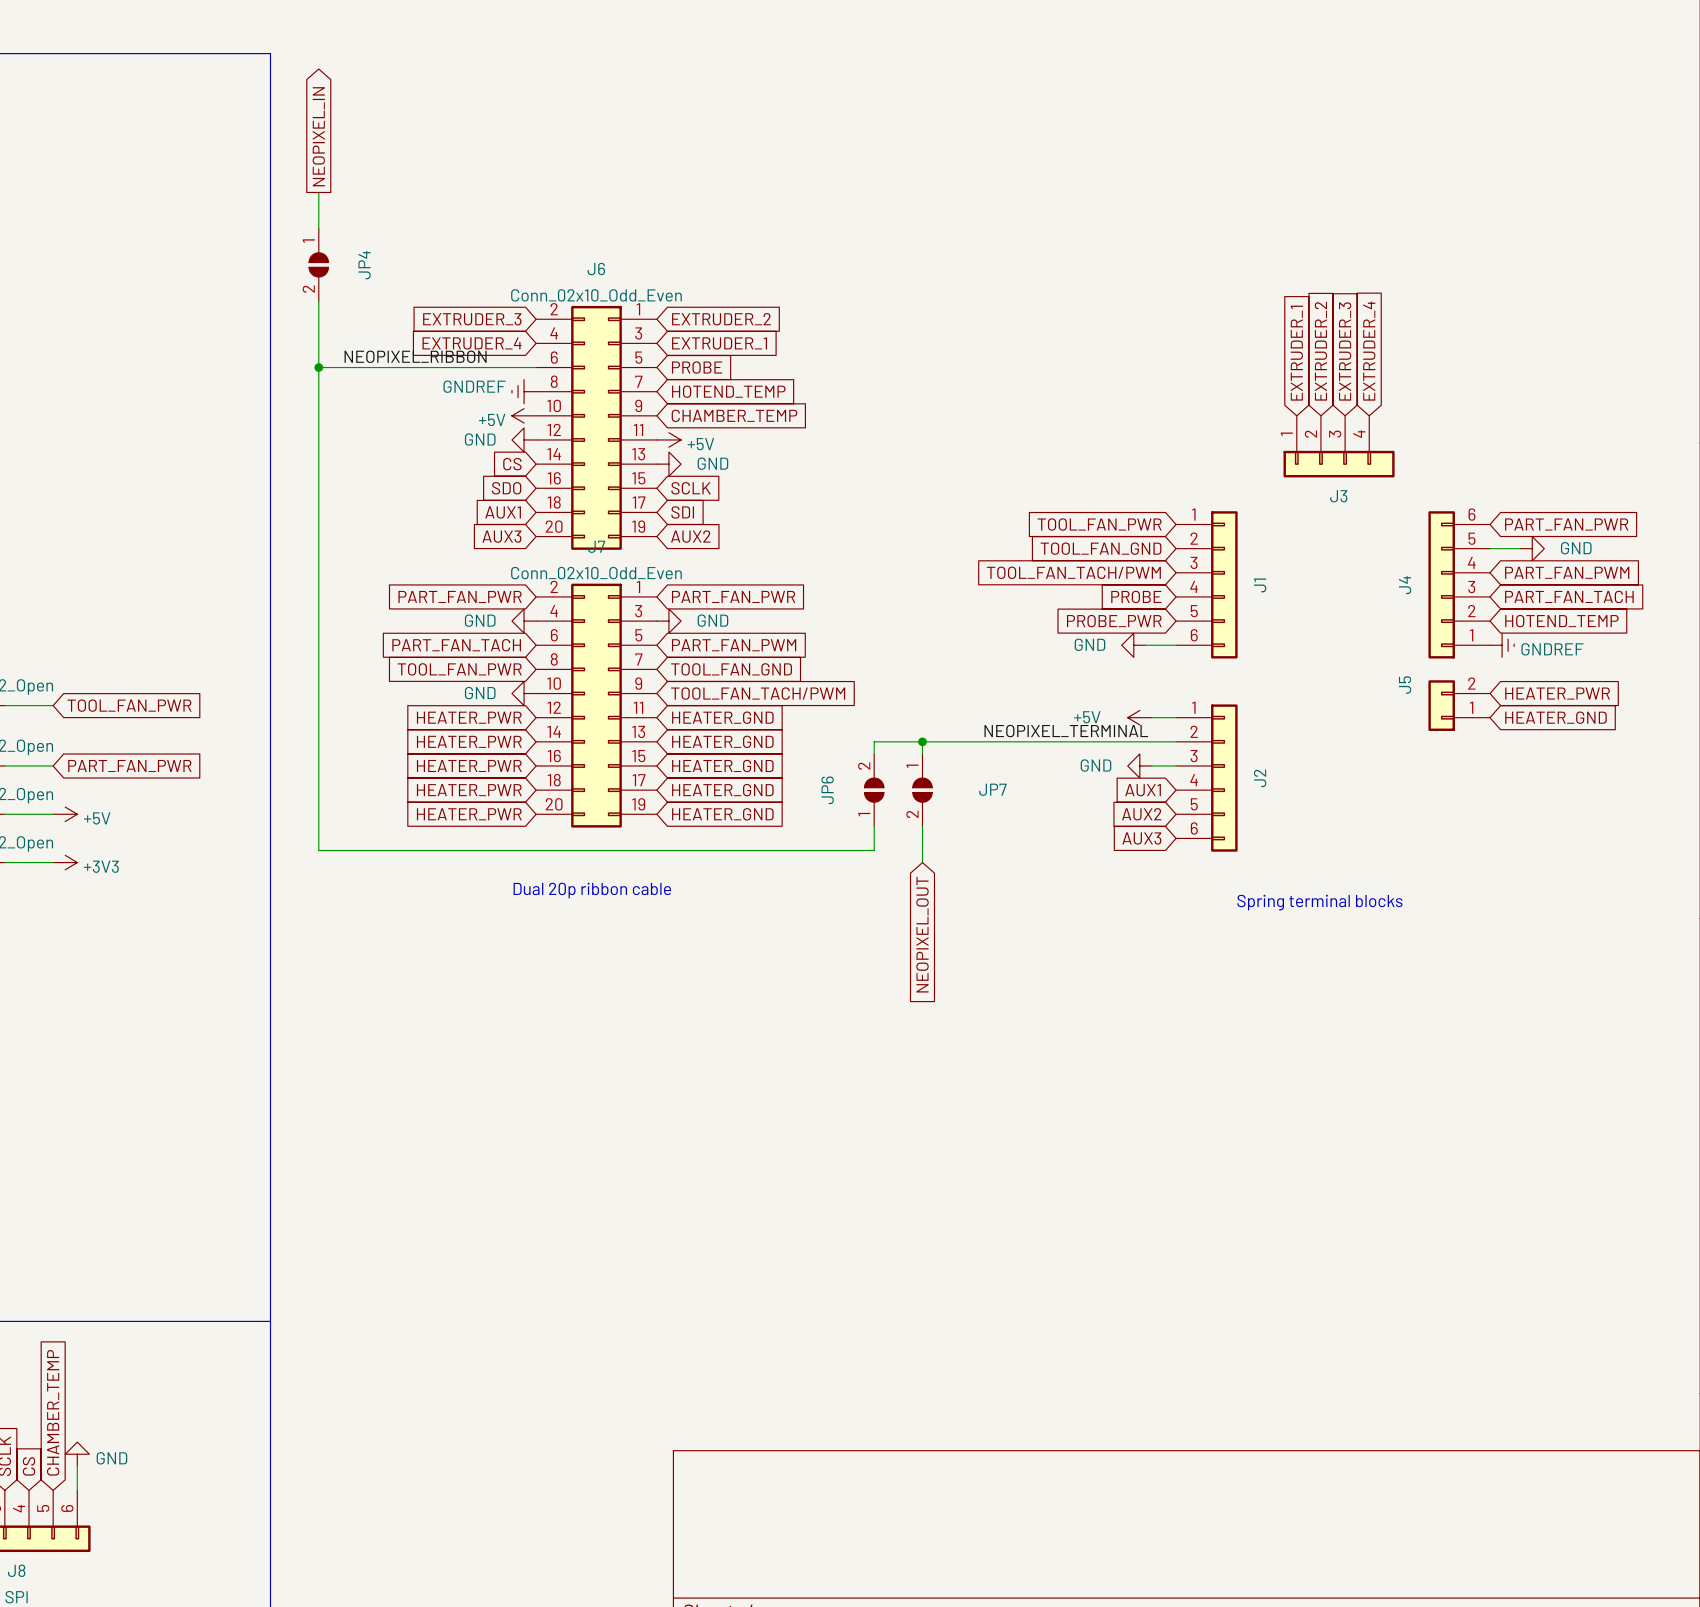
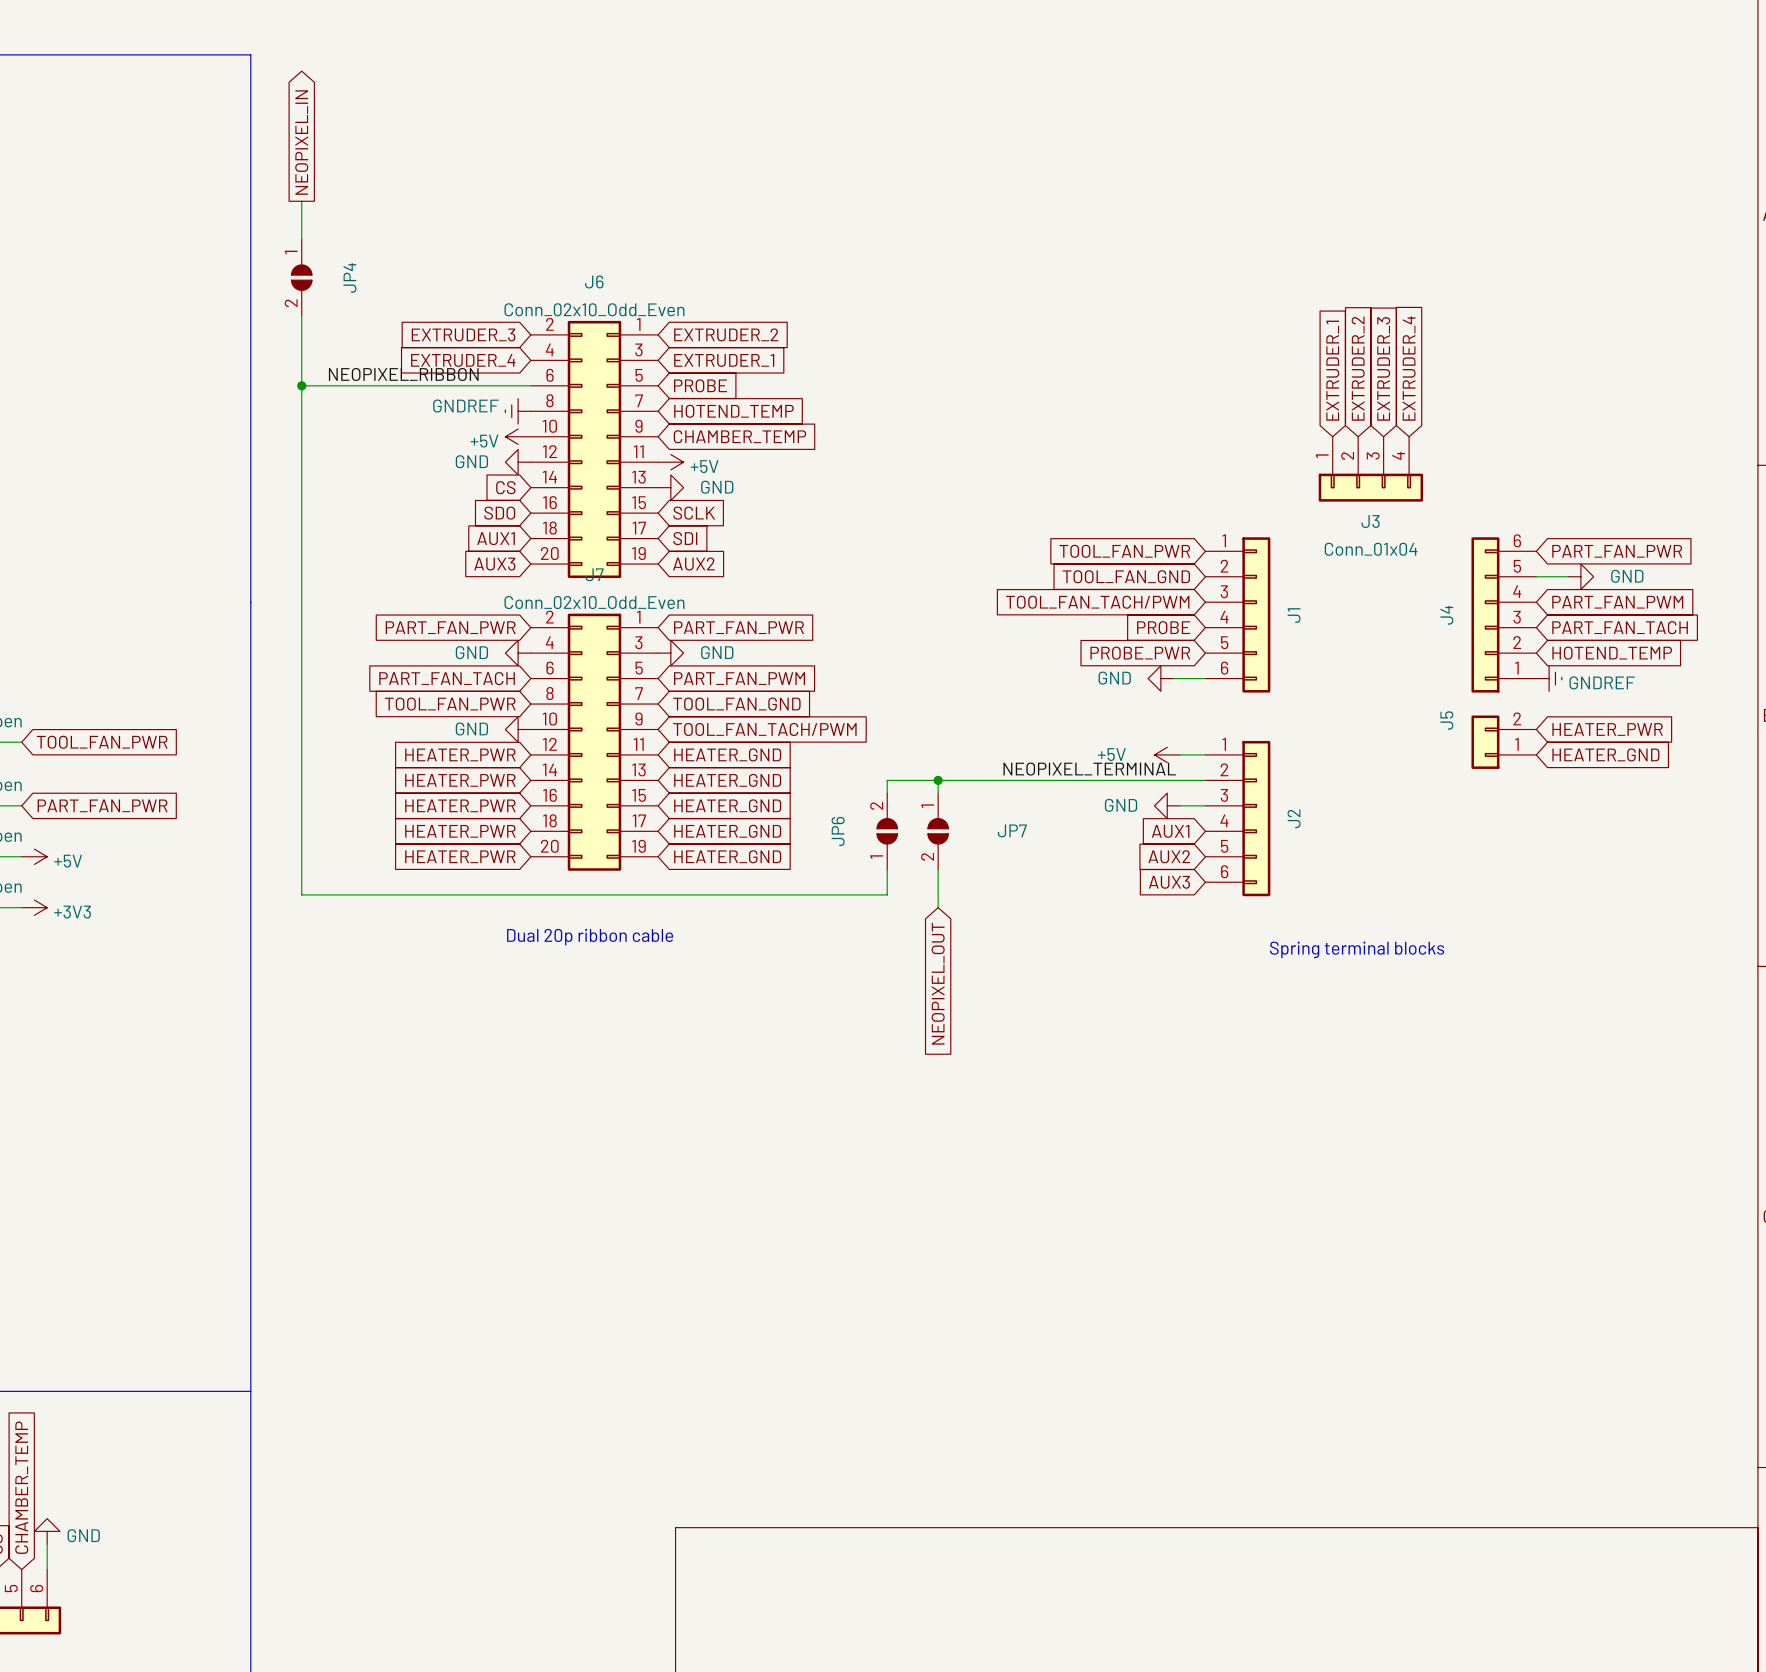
J3 symbol: [1283, 415, 1395, 478] -> [1318, 436, 1424, 502]
J3 value: none -> Conn_01x04 (1371, 549)

